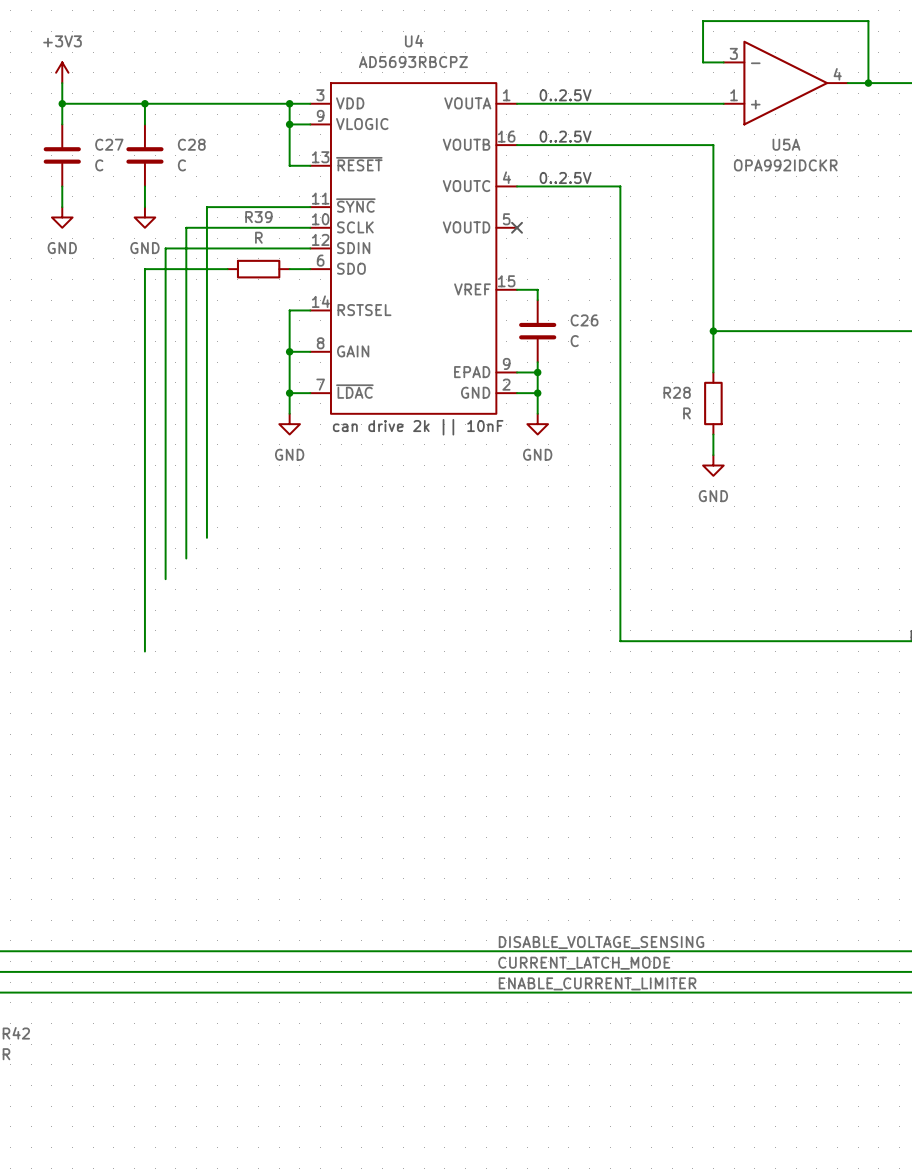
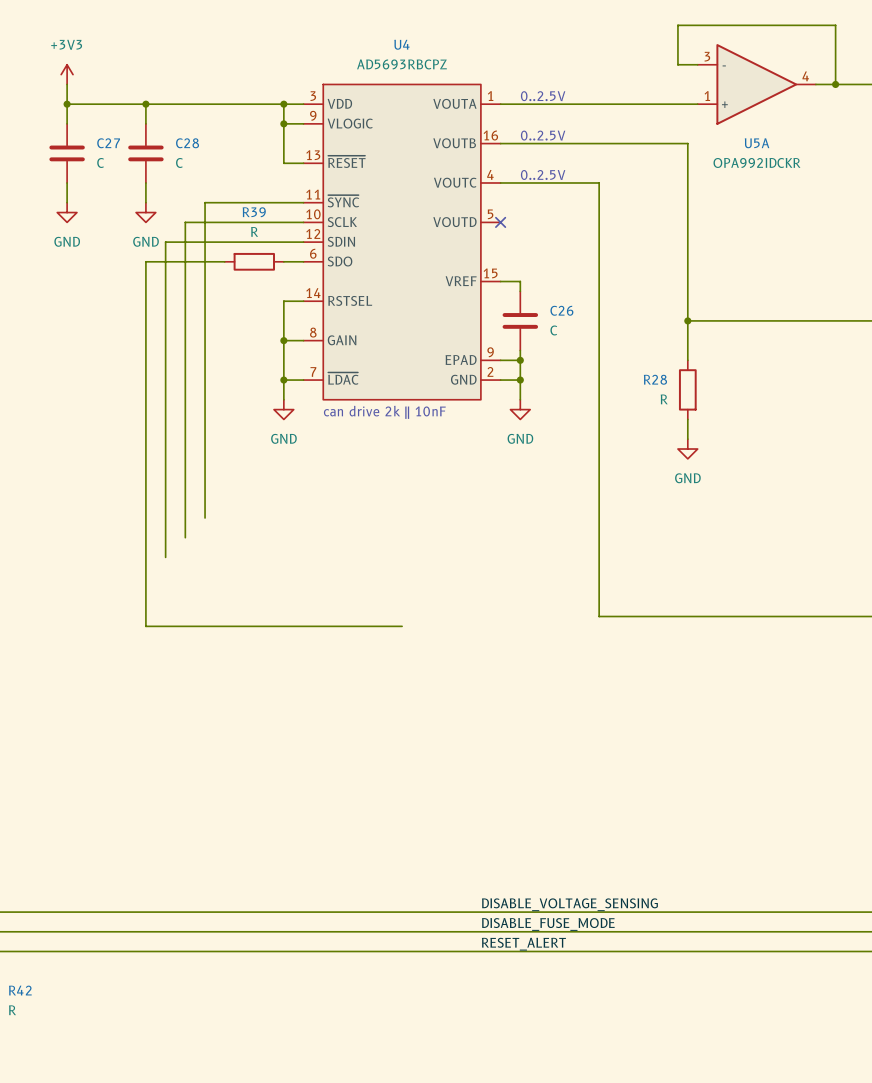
wire: none -> (145, 626) (402, 626)
label: CURRENT_LATCH_MODE (584, 963) -> DISABLE_FUSE_MODE (548, 924)
label: ENABLE_CURRENT_LIMITER (597, 983) -> RESET_ALERT (523, 944)

